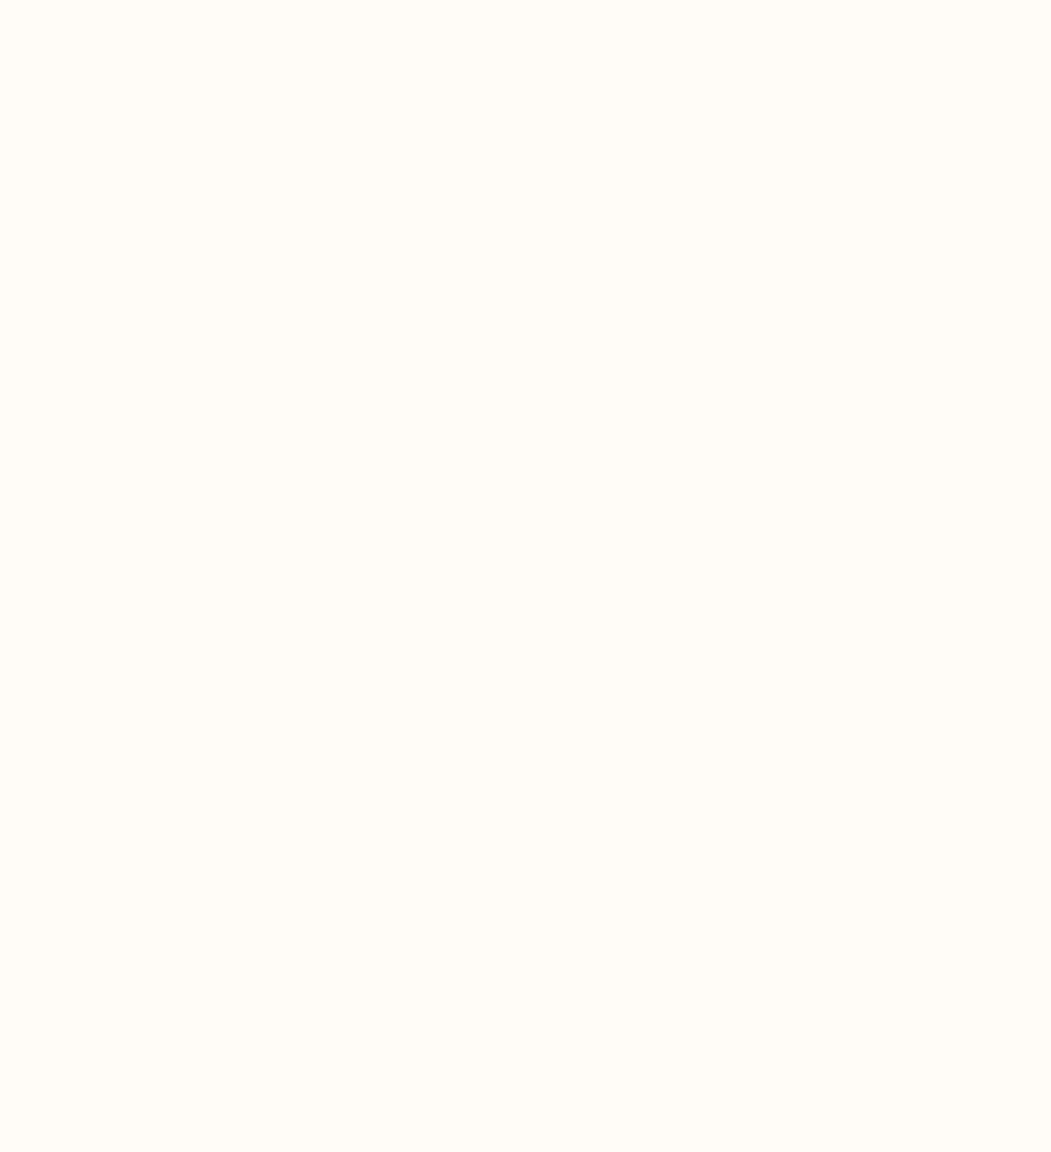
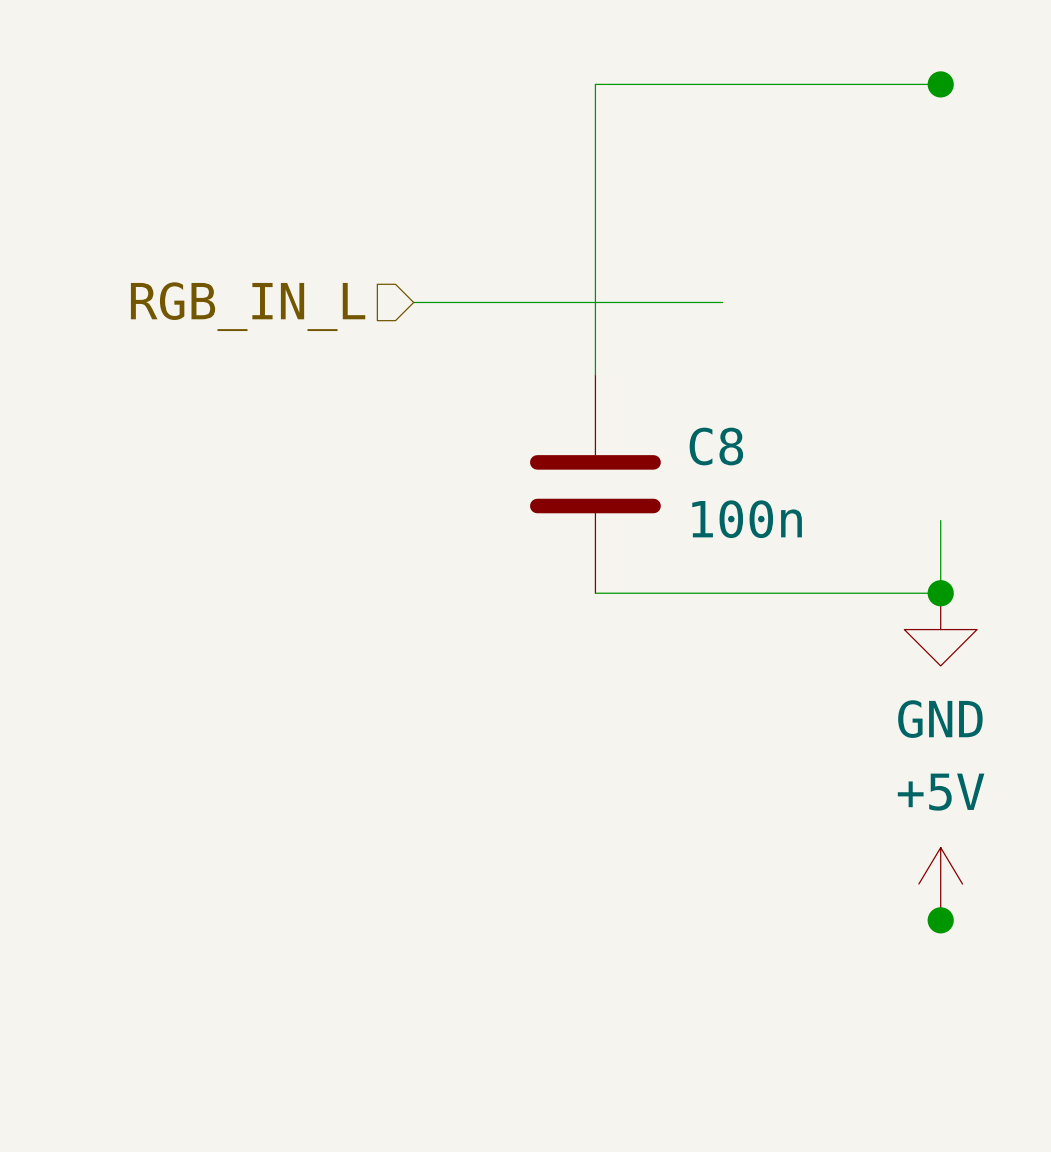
wire: none -> (940, 84) (595, 84) (595, 375)
junction: none -> (940, 84)
hierarchical label: none -> RGB_IN_L (248, 306)
wire: none -> (413, 302) (722, 302)
C8: none -> 100n (595, 484)
wire: none -> (940, 520) (940, 593) (595, 593)
junction: none -> (940, 593)
power symbol: none -> GND (940, 629)
power symbol: none -> +5V (940, 883)
junction: none -> (940, 920)

